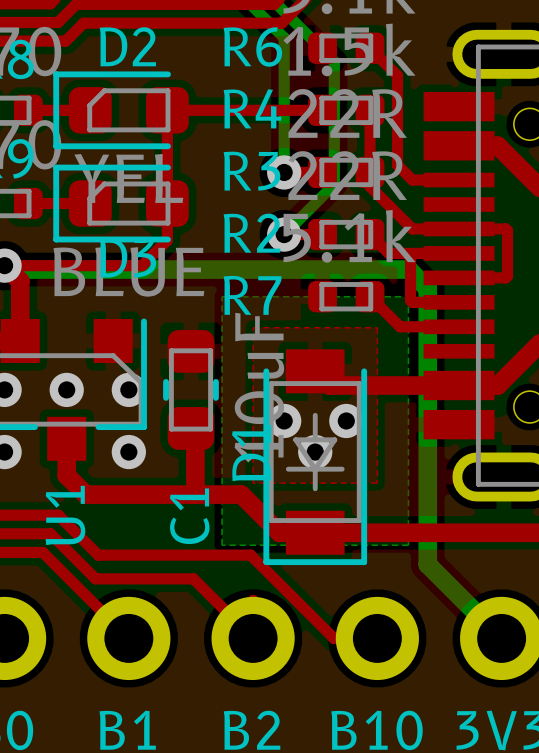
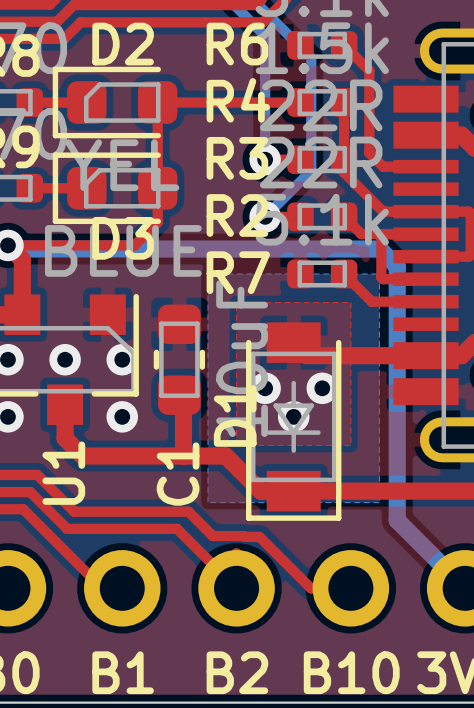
top track: (36, 515) (58, 515) (98, 555) -> (37, 474) (74, 511) (94, 511)
top track: (28, 533) (50, 533) (95, 578) (193, 578) -> (30, 492) (67, 528) (177, 528) (181, 533)
top track: (21, 552) (42, 552) (128, 638) -> (23, 509) (102, 588) (112, 588)
top track: (200, 555) (250, 555) (278, 582) -> (188, 511) (212, 536) (259, 536)

